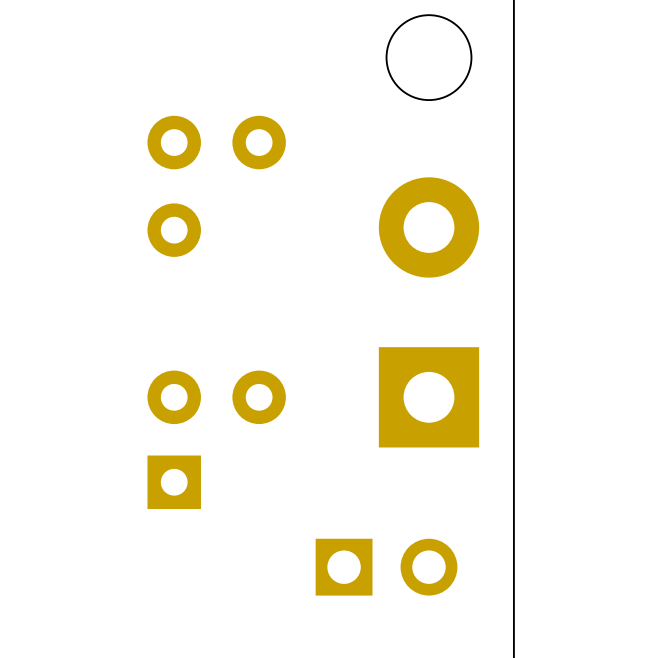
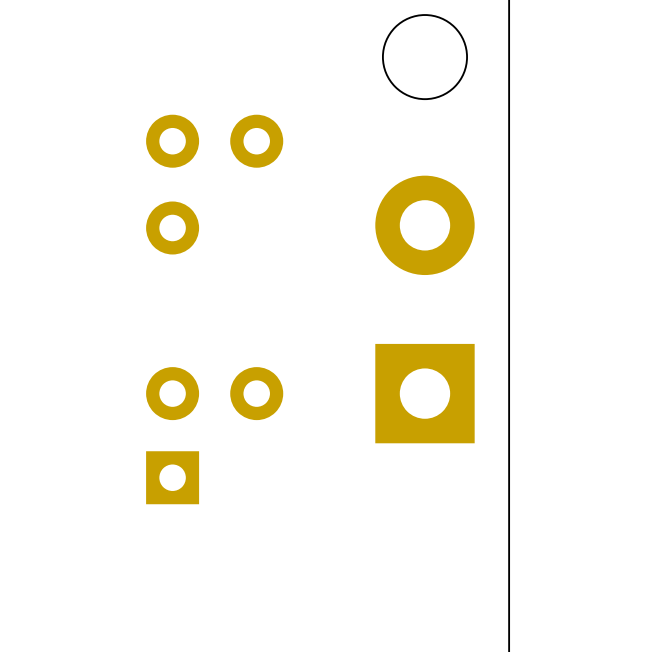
part: (386, 567) -> none

